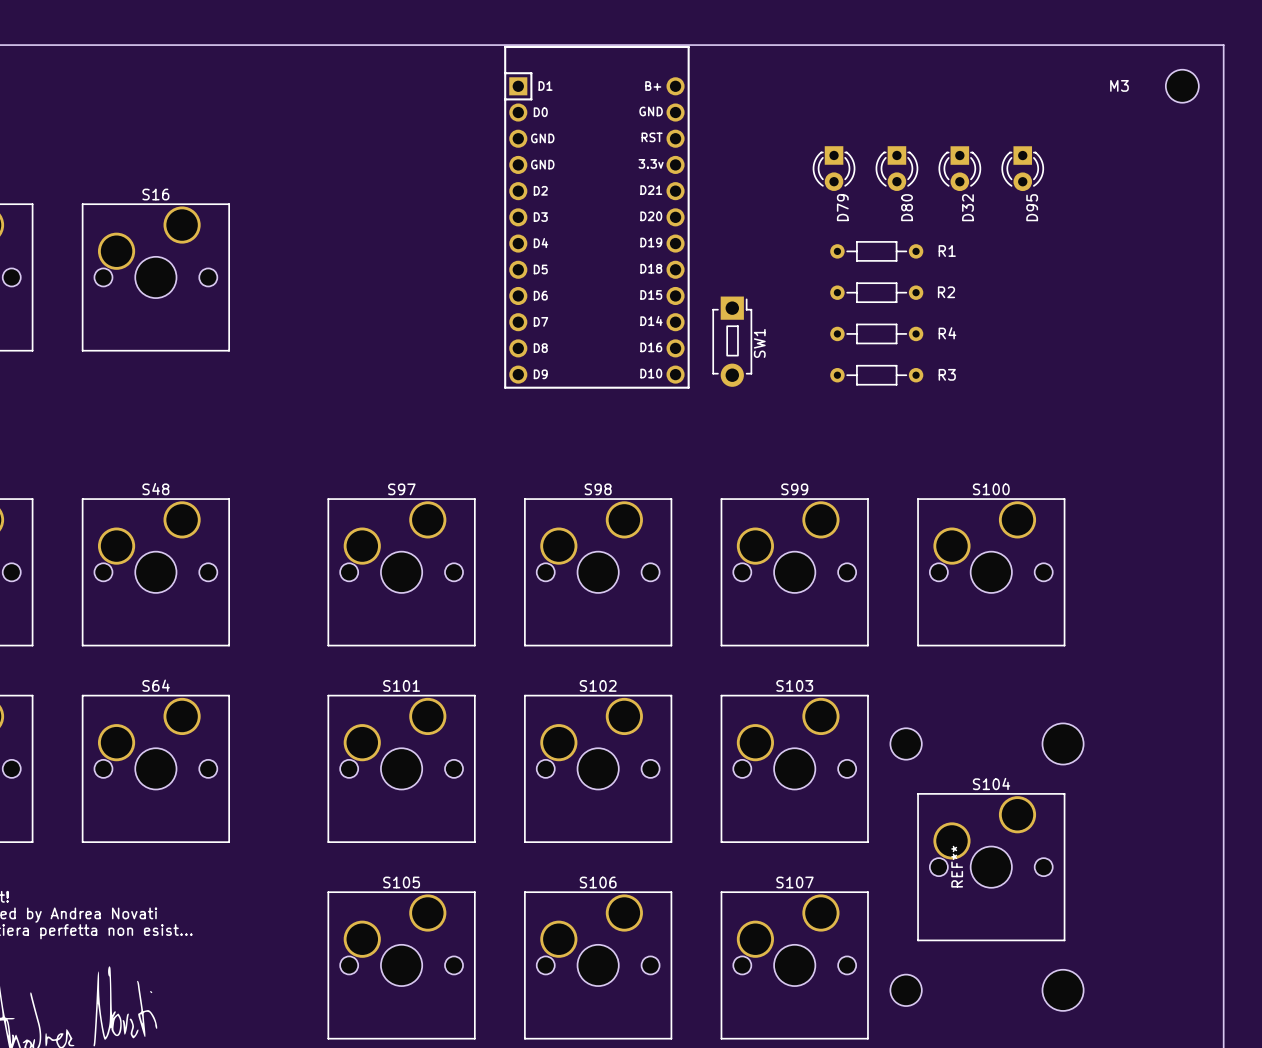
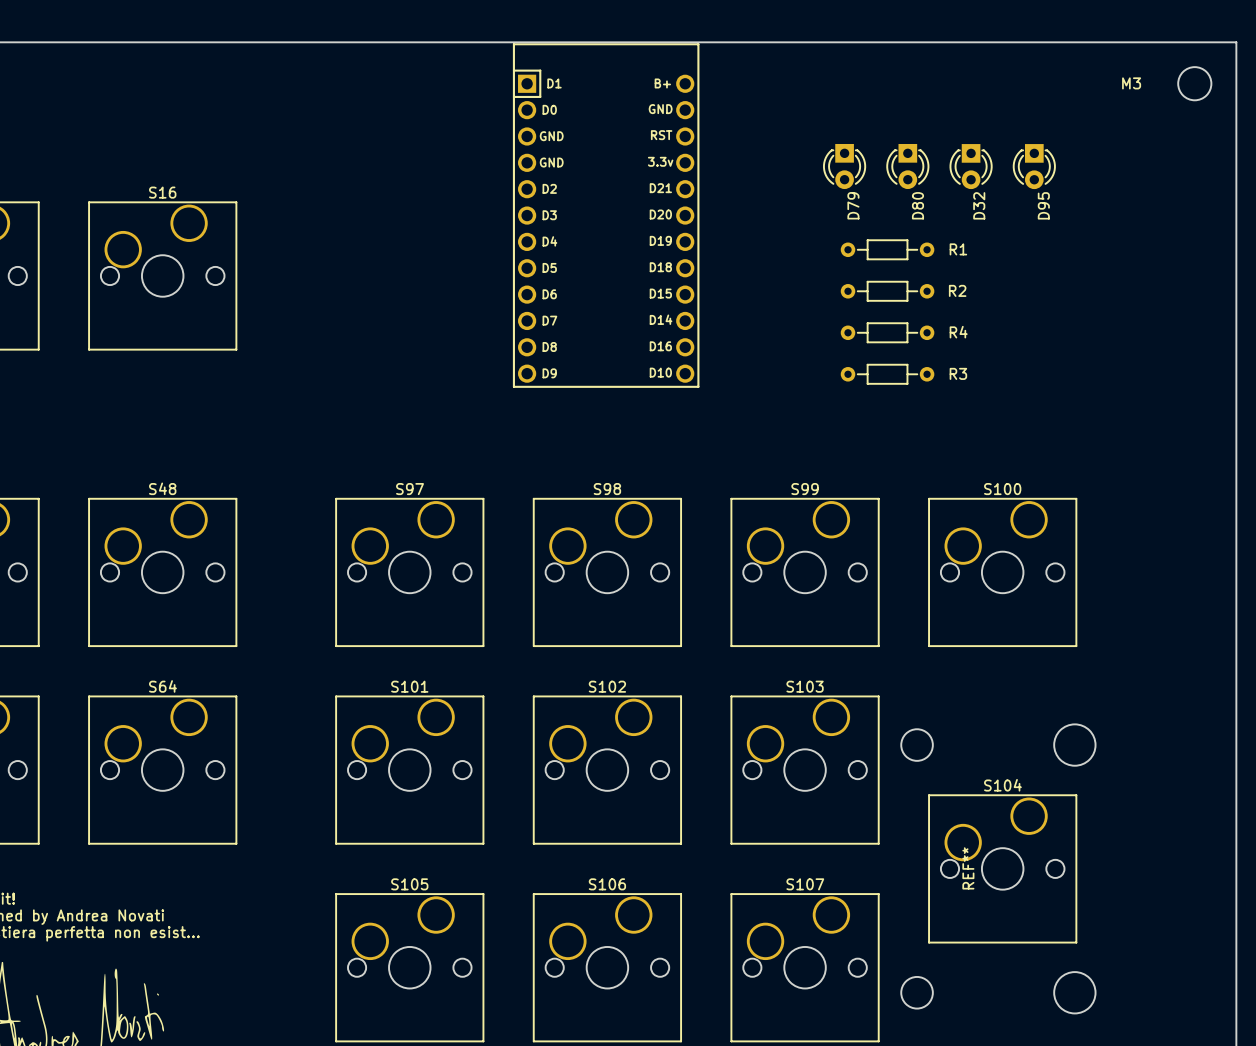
SW1: (732, 341) -> none

